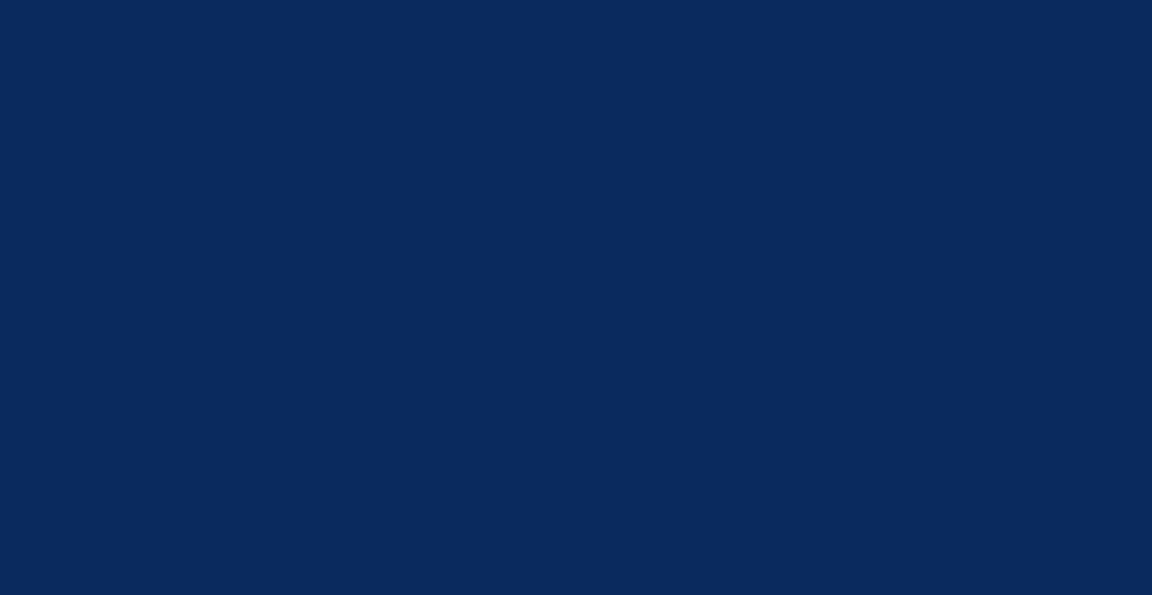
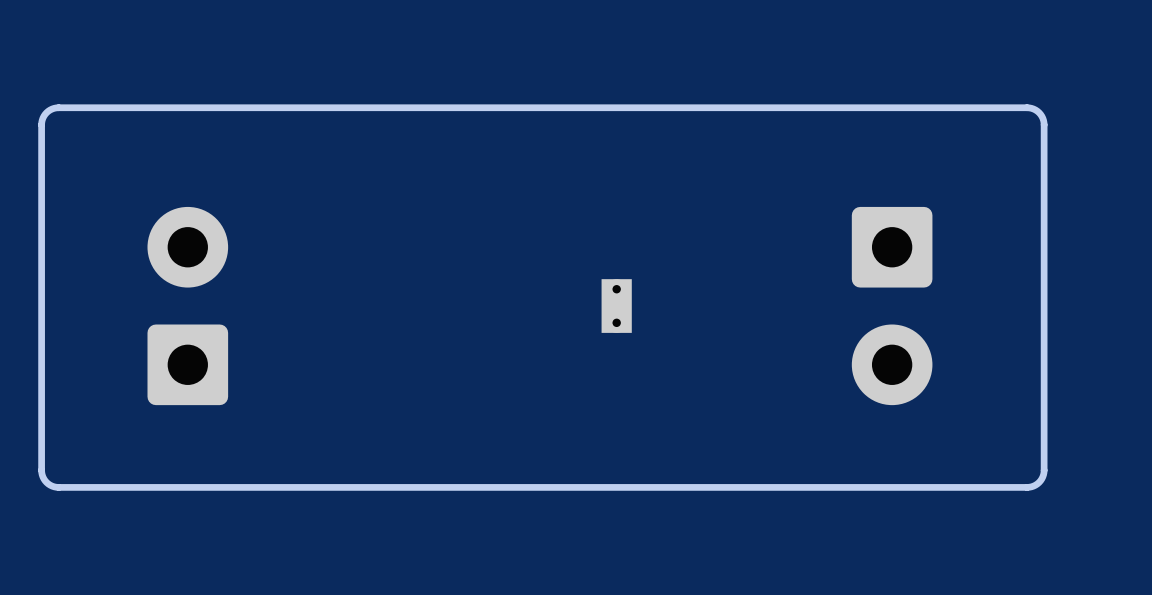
board edge: none -> (1027, 107) (52, 109) (45, 114) (41, 124) (42, 476) (50, 485) (58, 487) (1033, 486) (1040, 480) (1044, 470) (1044, 124) (1039, 112) (1027, 107)
part: none -> (187, 306)
part: none -> (616, 306)
part: none -> (892, 306)

